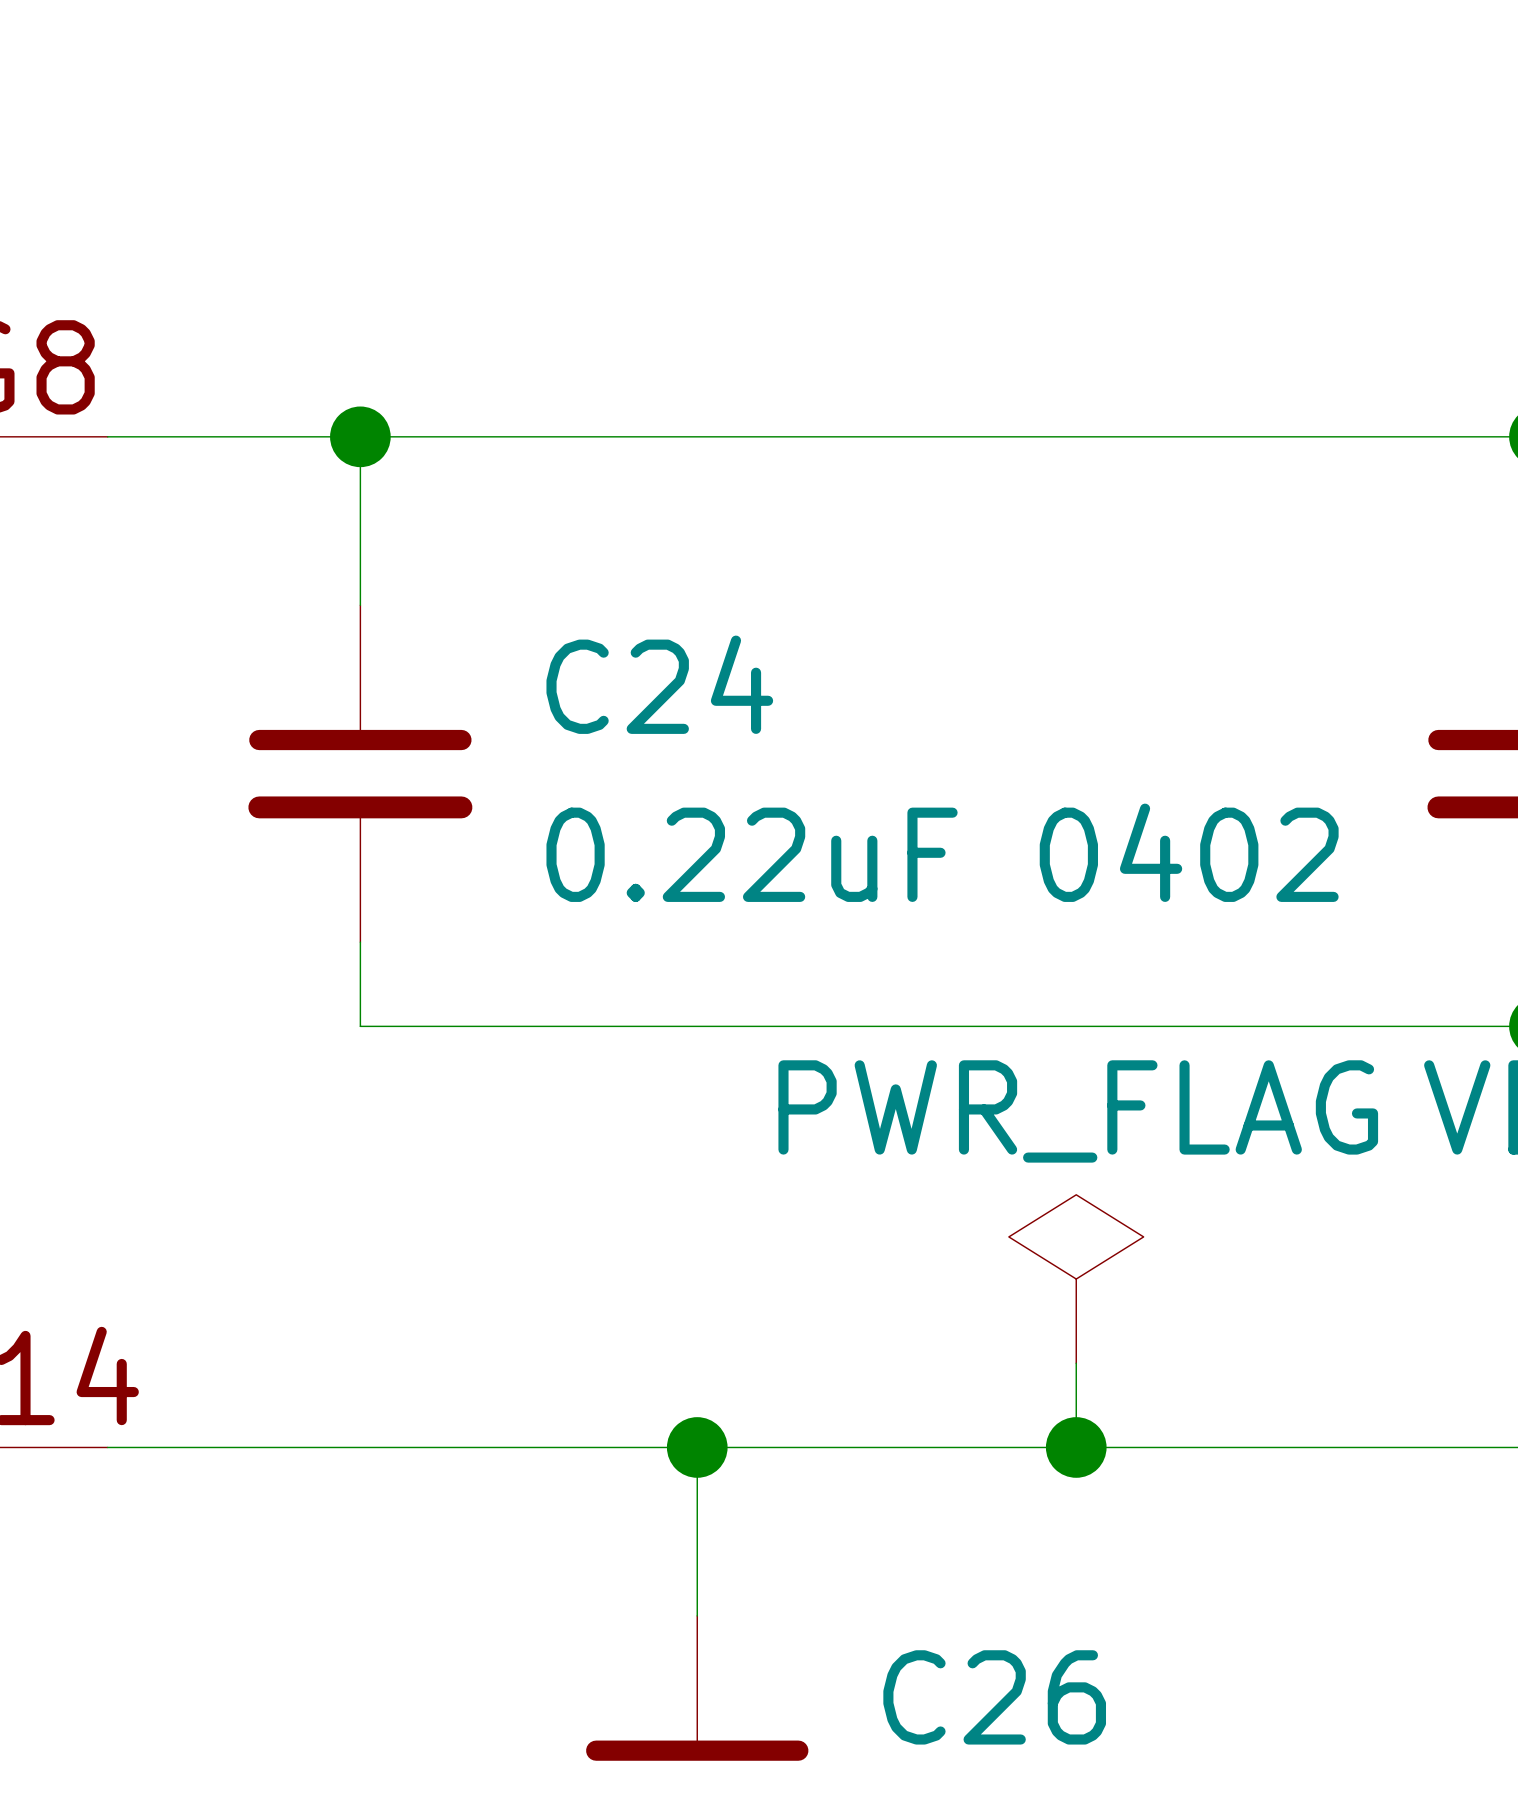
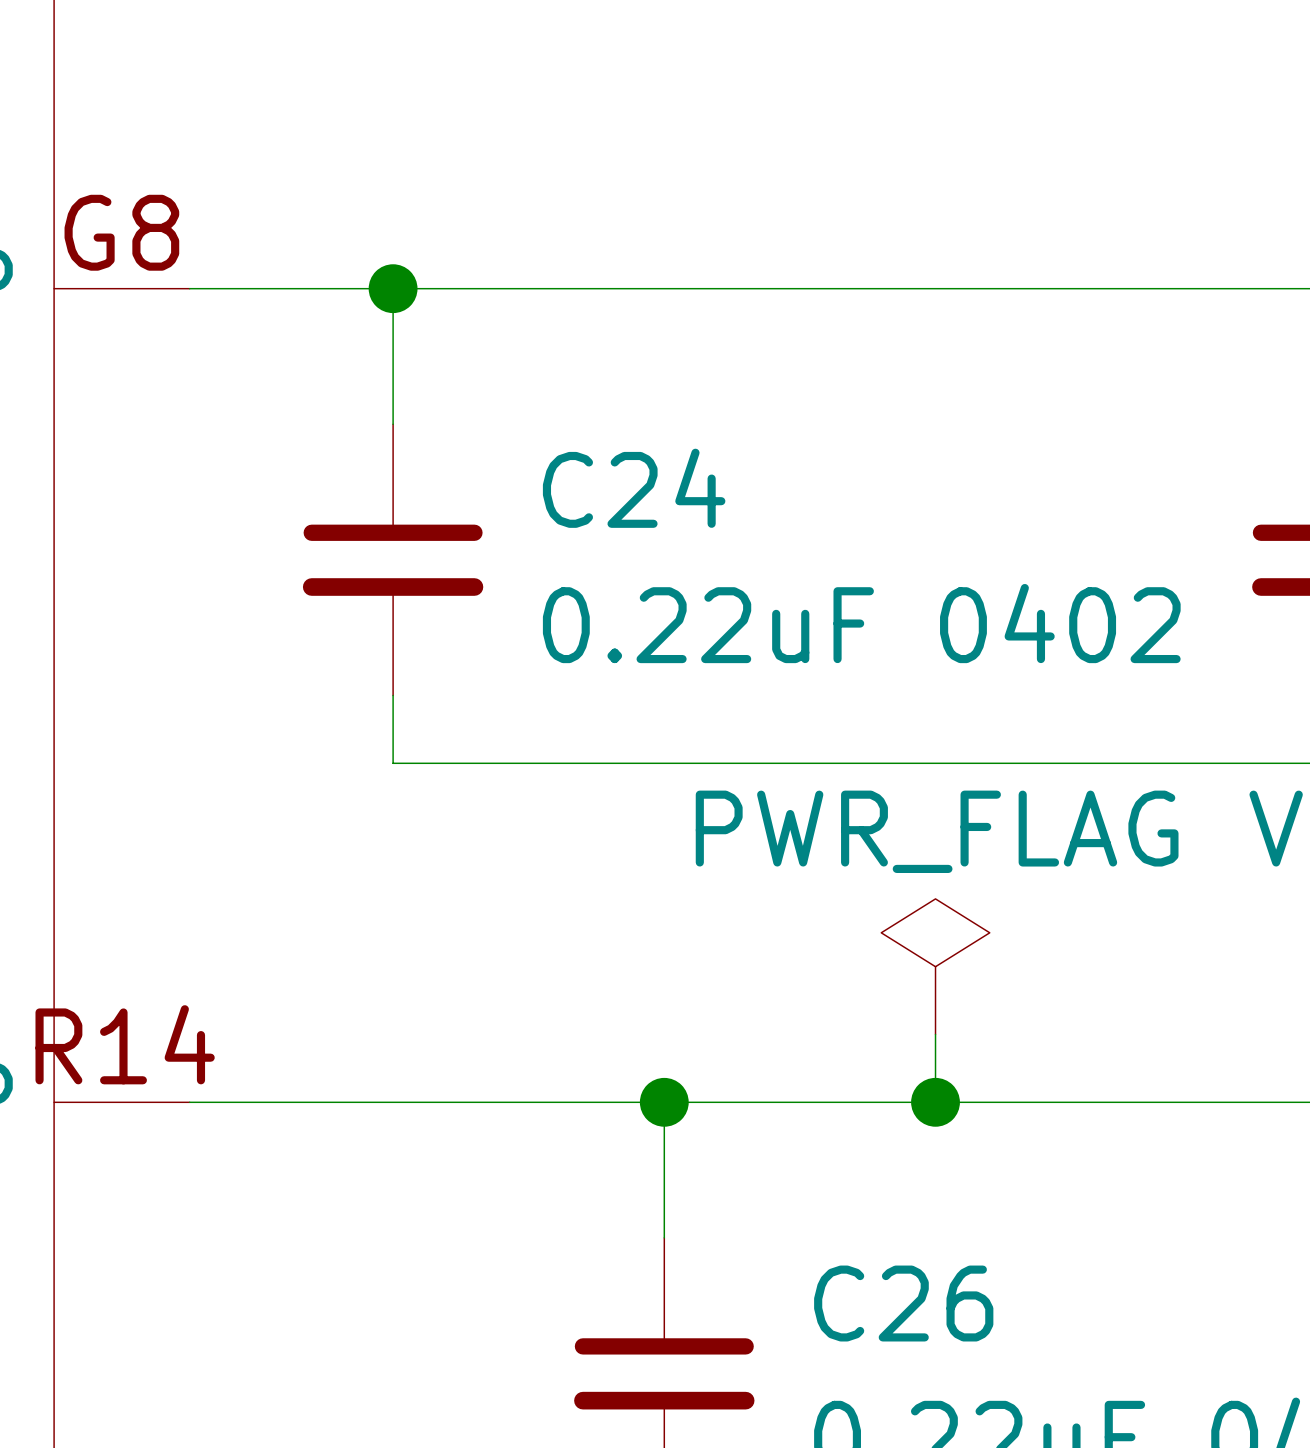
power symbol position: PWR_FLAG (1076, 1279) -> PWR_FLAG (935, 966)
wire: (1076, 1363) (1076, 1447) -> (935, 1034) (935, 1102)
junction position: (1076, 1447) -> (935, 1102)

